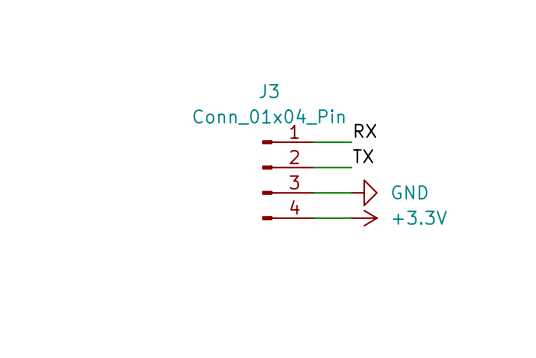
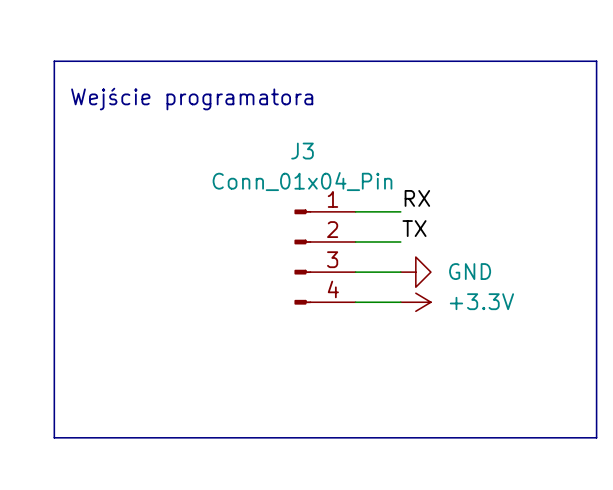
line: none -> (54, 61) (596, 61) (596, 437) (54, 437) (54, 61)
text: none -> Wejście programatora (192, 99)

